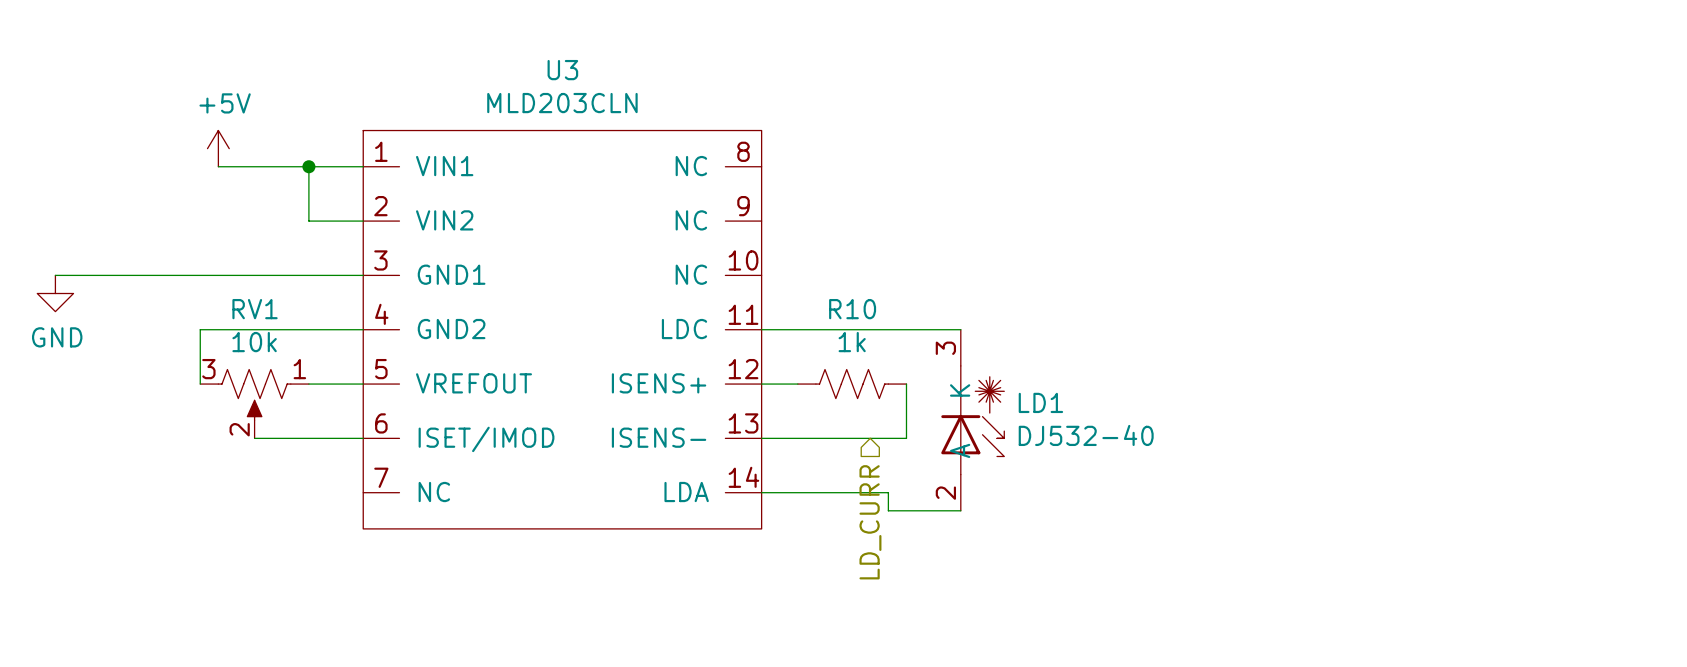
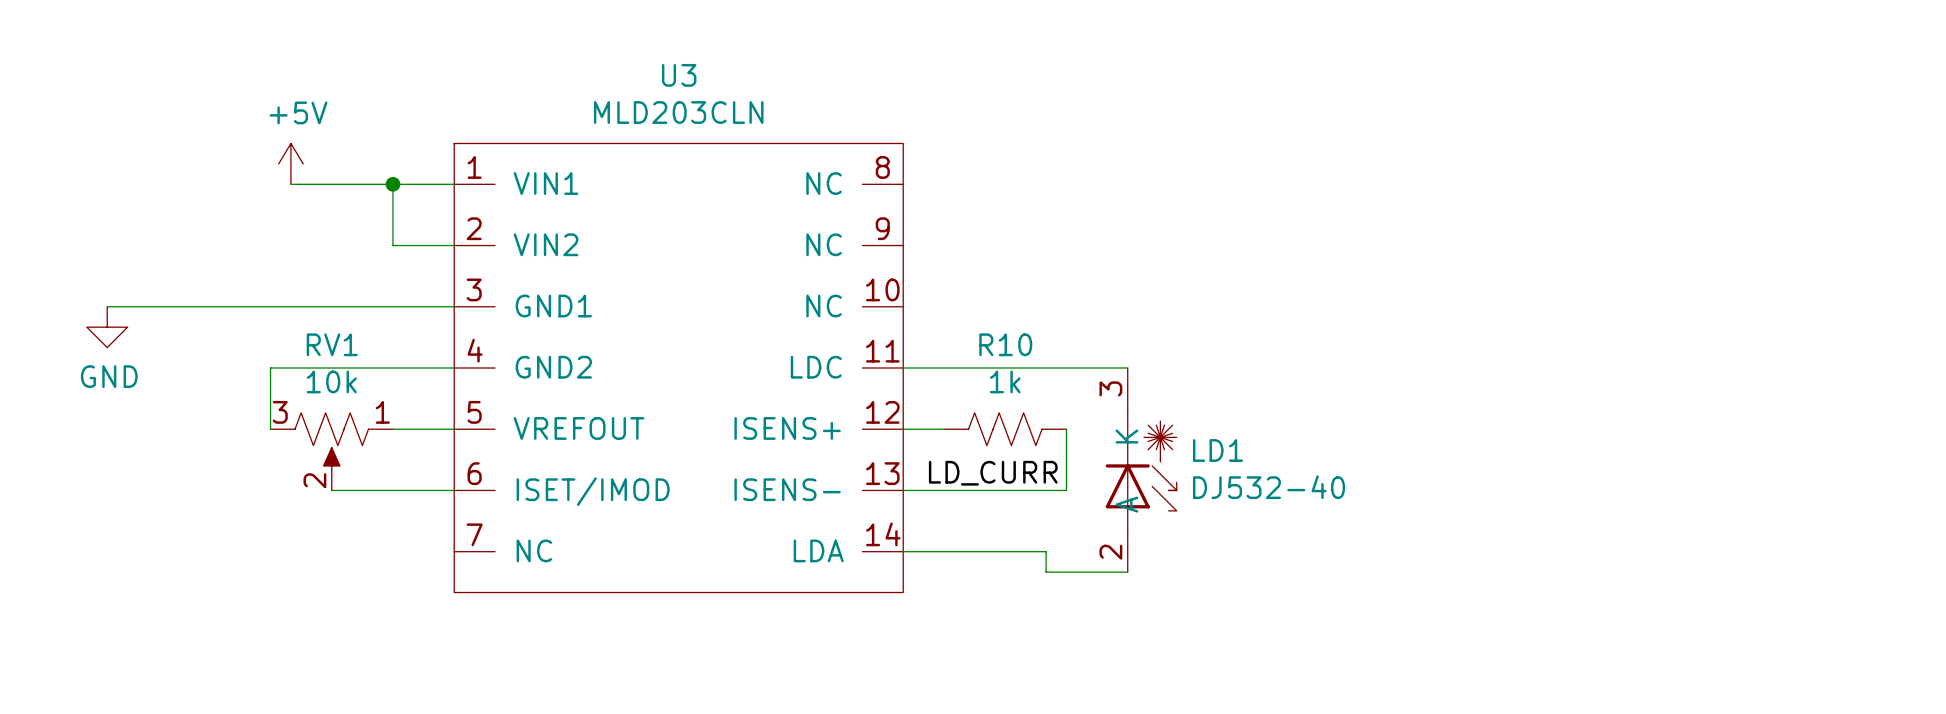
label: none -> LD_CURR (993, 473)
hierarchical label: LD_CURR (870, 522) -> none

